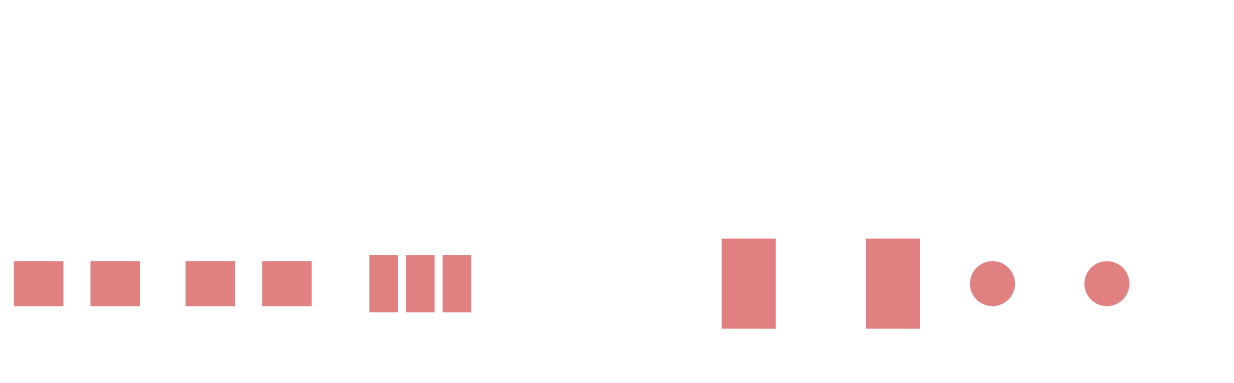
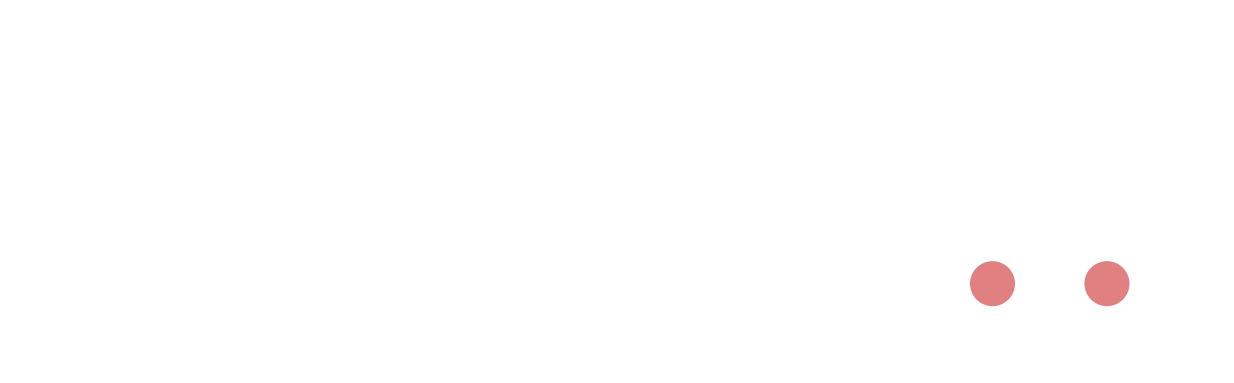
part: (76, 283) -> none
part: (248, 283) -> none
part: (420, 283) -> none
part: (820, 283) -> none

